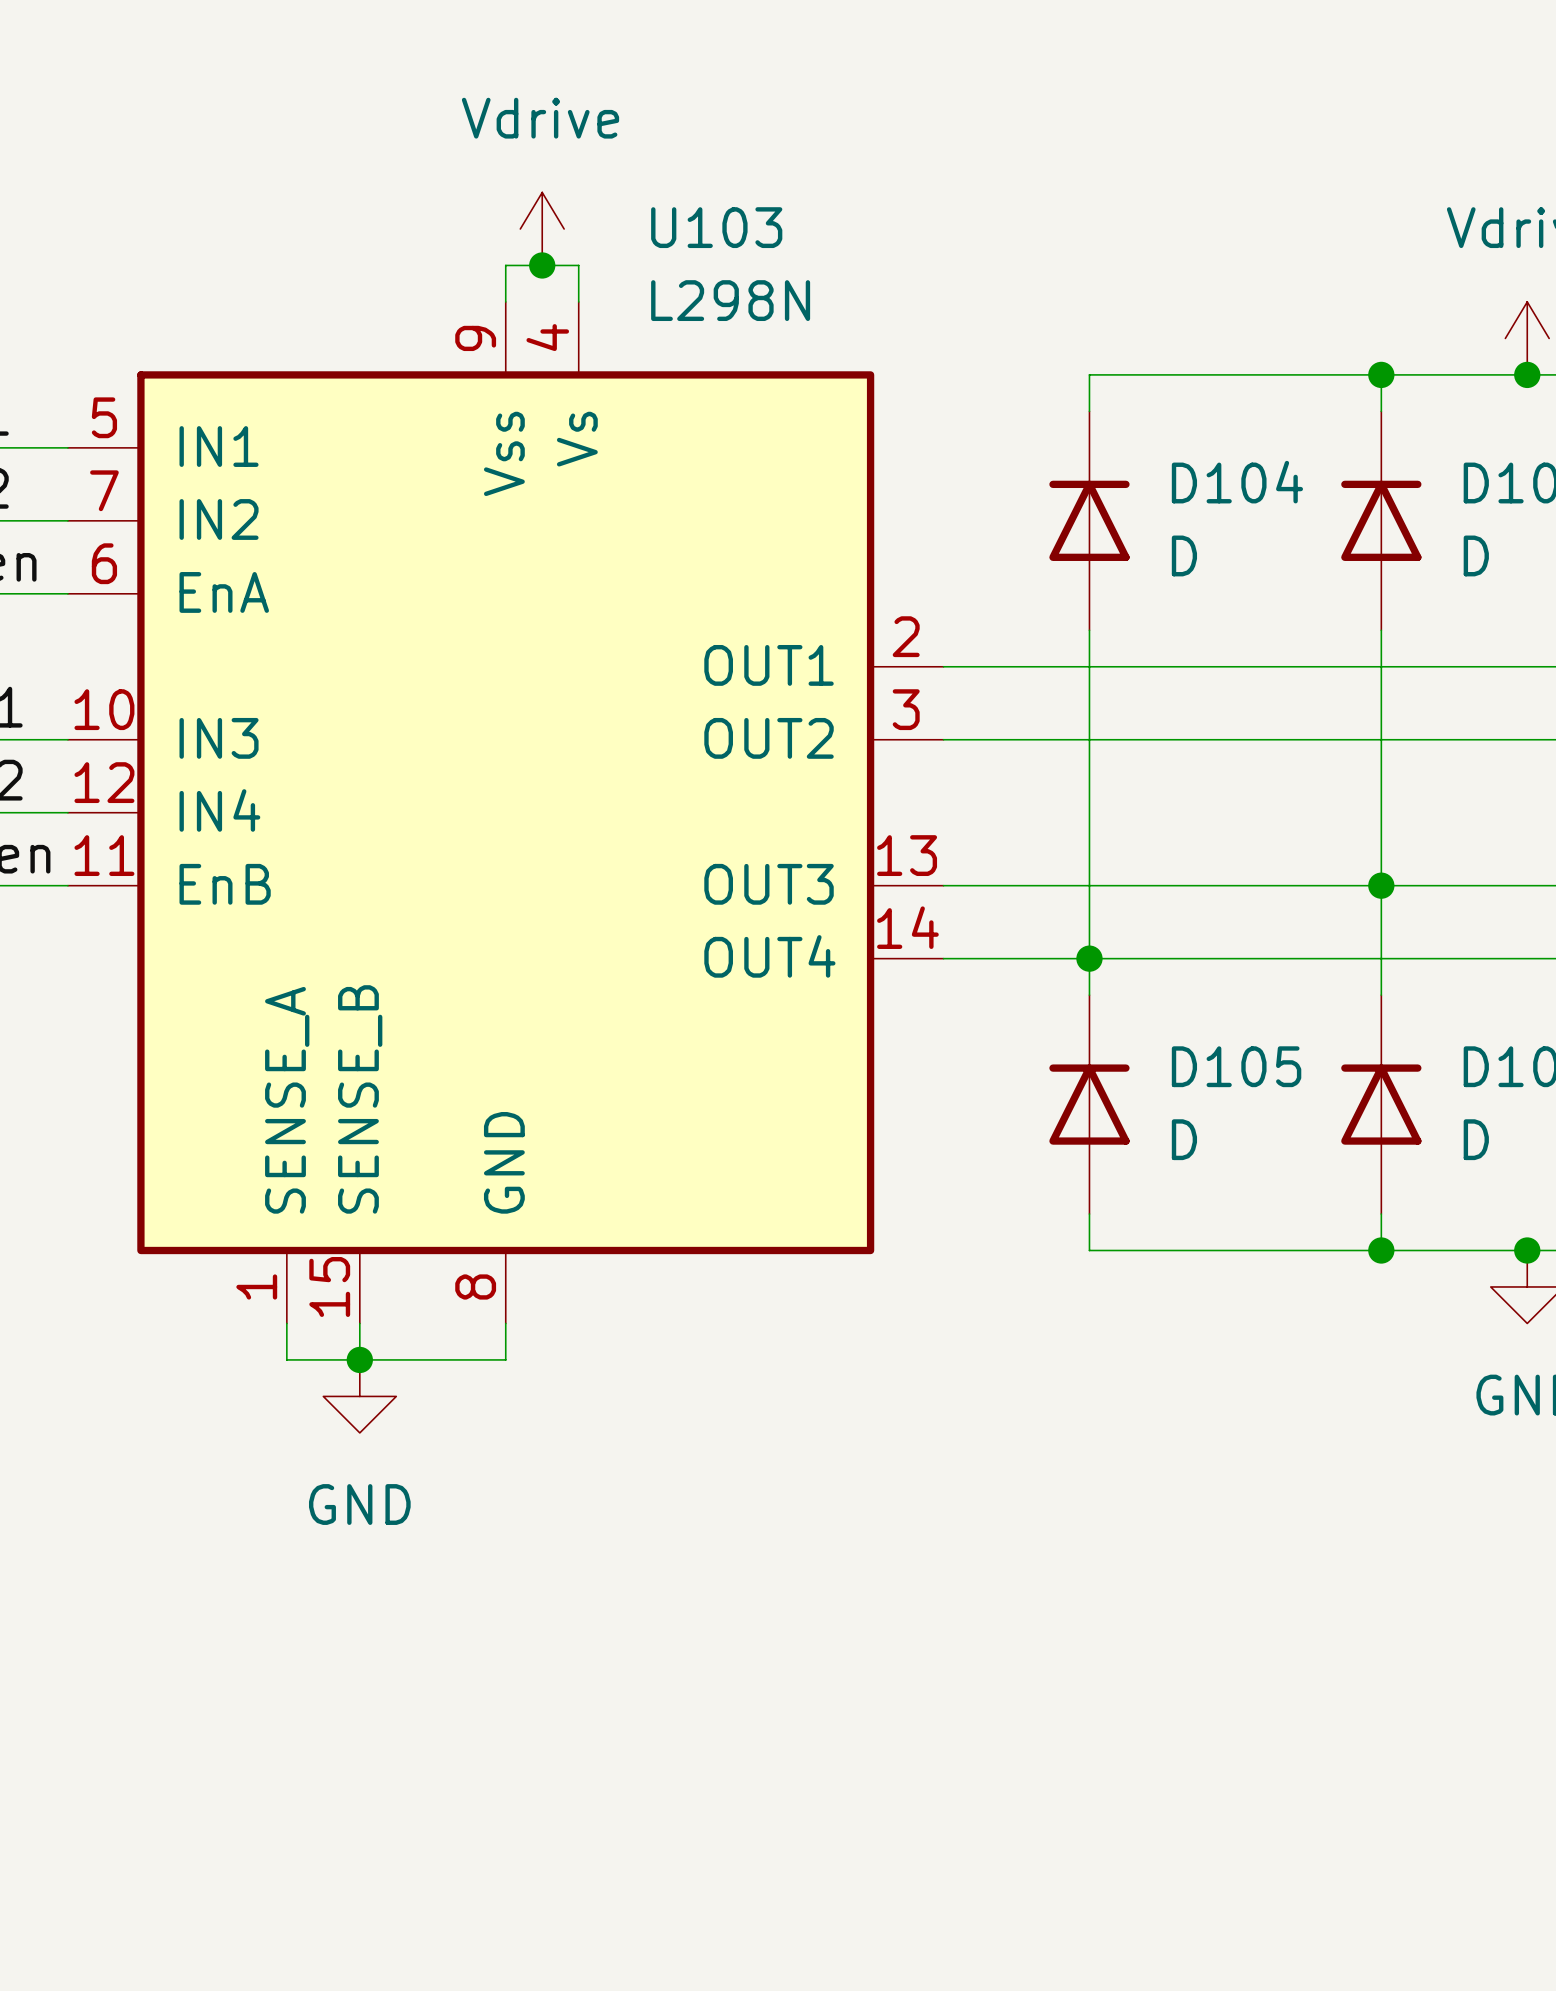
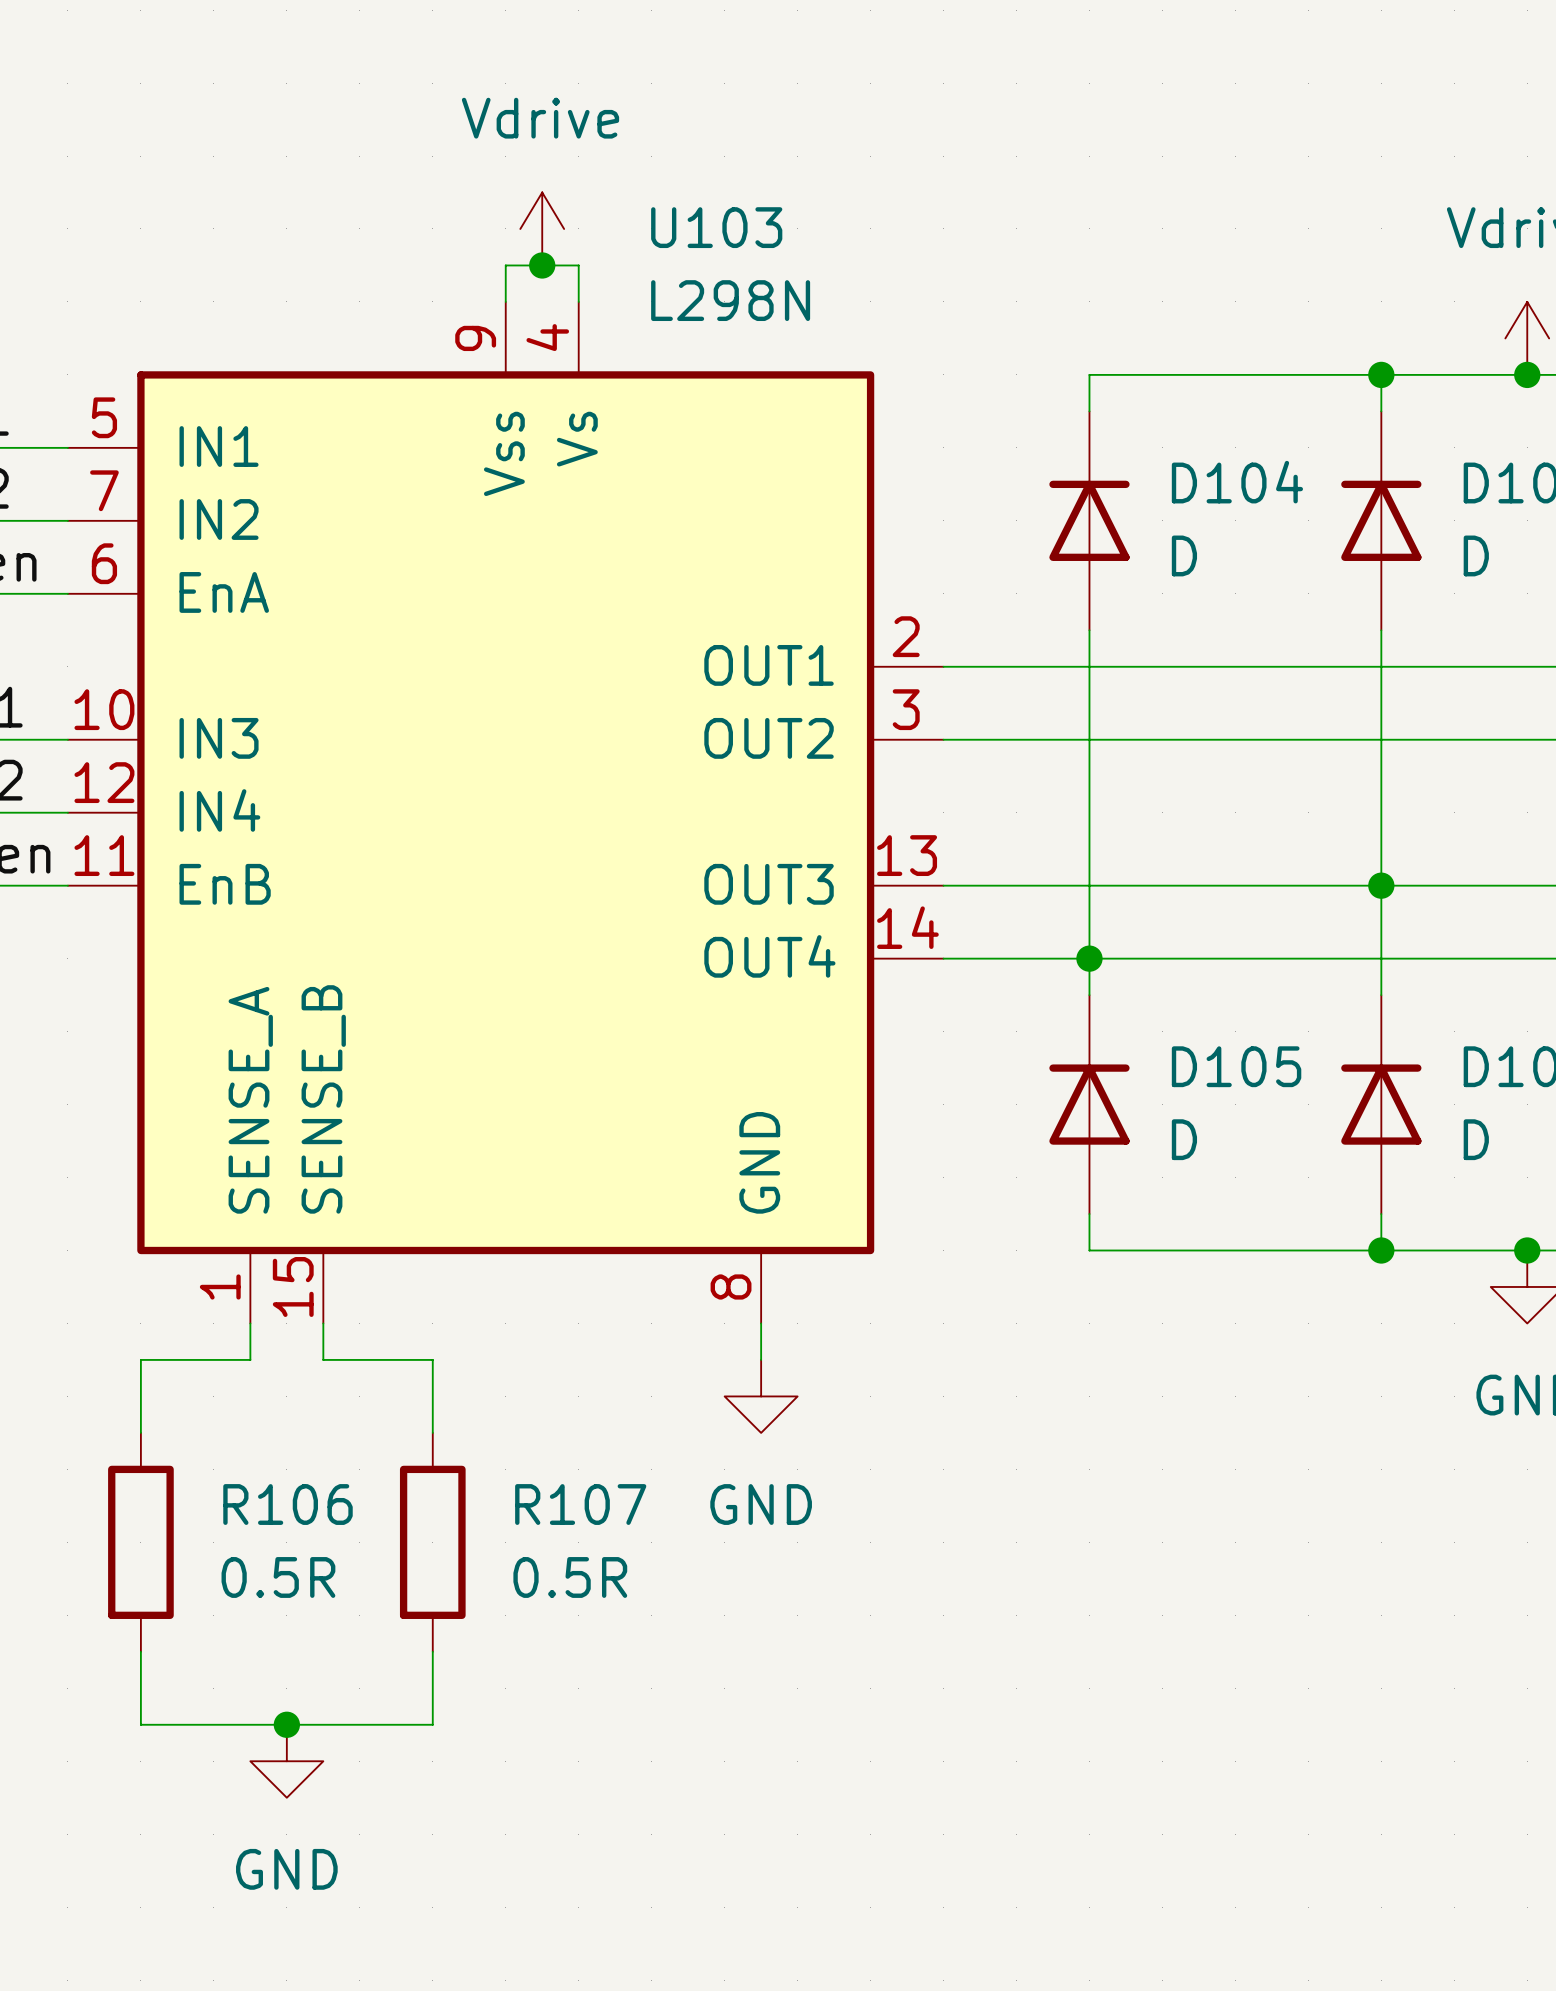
U103 symbol: [67, 301, 944, 1324] -> [67, 301, 944, 1324]
wire: none -> (250, 1323) (250, 1359) (140, 1359) (140, 1432)
wire: (286, 1323) (286, 1359) (323, 1359) -> (323, 1323) (323, 1359)
wire: (359, 1323) (359, 1359) -> (761, 1323) (761, 1359)
wire: (505, 1323) (505, 1359) (432, 1359) -> (432, 1432) (432, 1359)
junction: (359, 1359) -> none
power symbol: GND (359, 1396) -> none
power symbol: none -> GND (761, 1396)
R106: none -> 0.5R (140, 1542)
R107: none -> 0.5R (432, 1542)
wire: none -> (140, 1651) (140, 1724) (432, 1724) (432, 1651)
junction: none -> (286, 1724)
power symbol: none -> GND (286, 1761)

